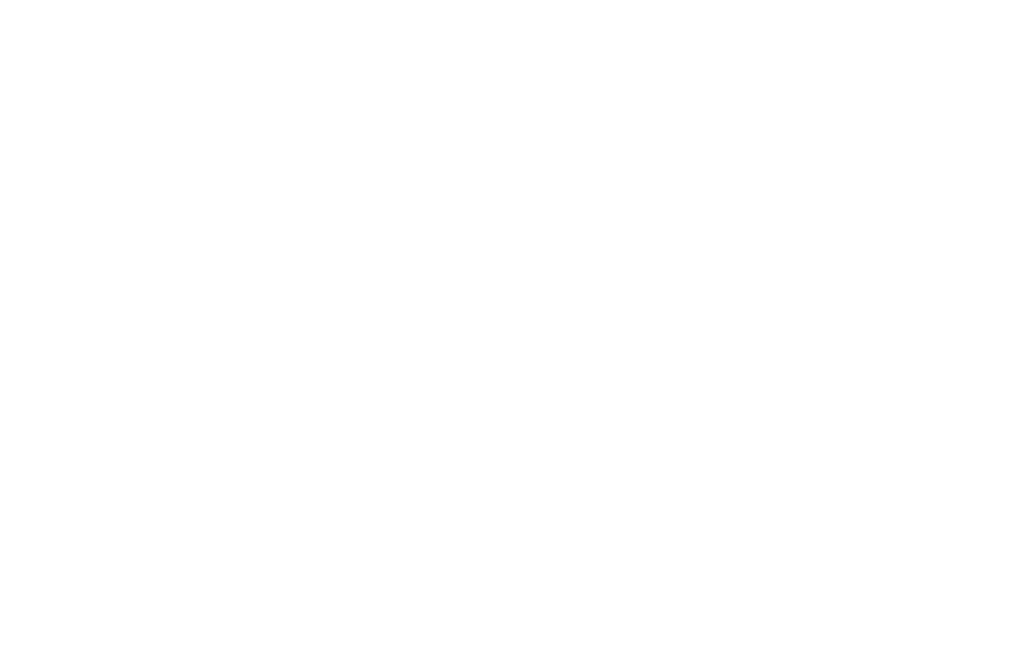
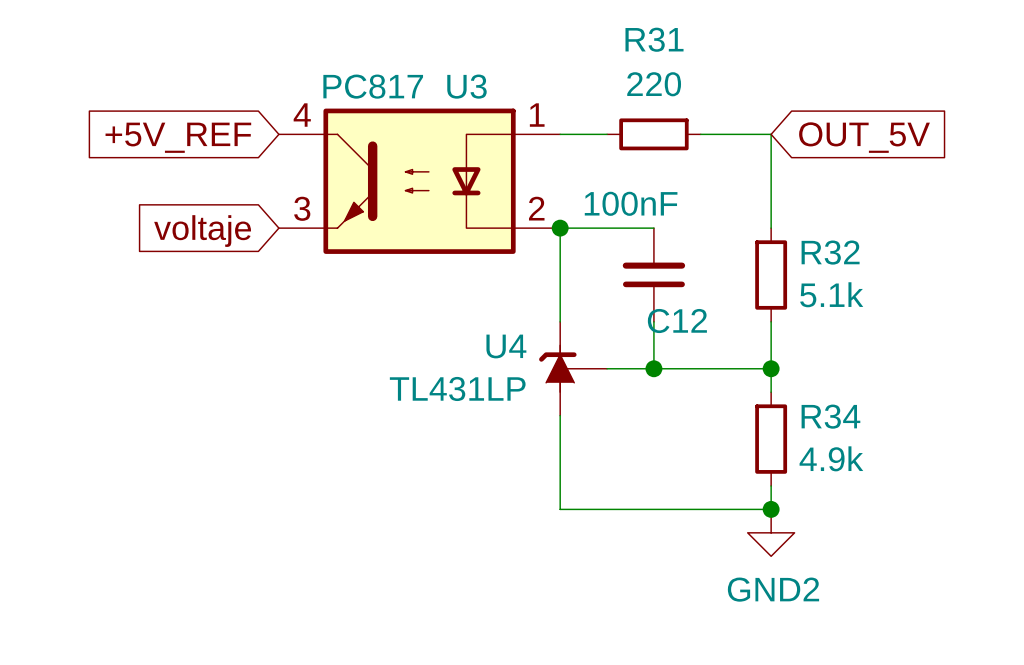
wire: none -> (560, 134) (607, 134)
R31: none -> 220 (653, 134)
wire: none -> (700, 134) (771, 134) (771, 228)
global label: none -> +5V_REF (178, 137)
global label: none -> OUT_5V (864, 137)
U3: none -> PC817 (419, 181)
junction: none -> (560, 228)
wire: none -> (653, 228) (560, 228) (560, 321)
global label: none -> voltaje (202, 231)
C12: none -> 100nF (653, 275)
R32: none -> 5.1k (771, 275)
wire: none -> (653, 321) (653, 368)
wire: none -> (771, 321) (771, 392)
U4: none -> TL431LP (573, 368)
wire: none -> (607, 368) (771, 368)
junction: none -> (653, 368)
junction: none -> (771, 368)
wire: none -> (560, 415) (560, 509) (771, 509) (771, 485)
R34: none -> 4.9k (771, 439)
junction: none -> (771, 509)
power symbol: none -> GND2 (771, 532)

